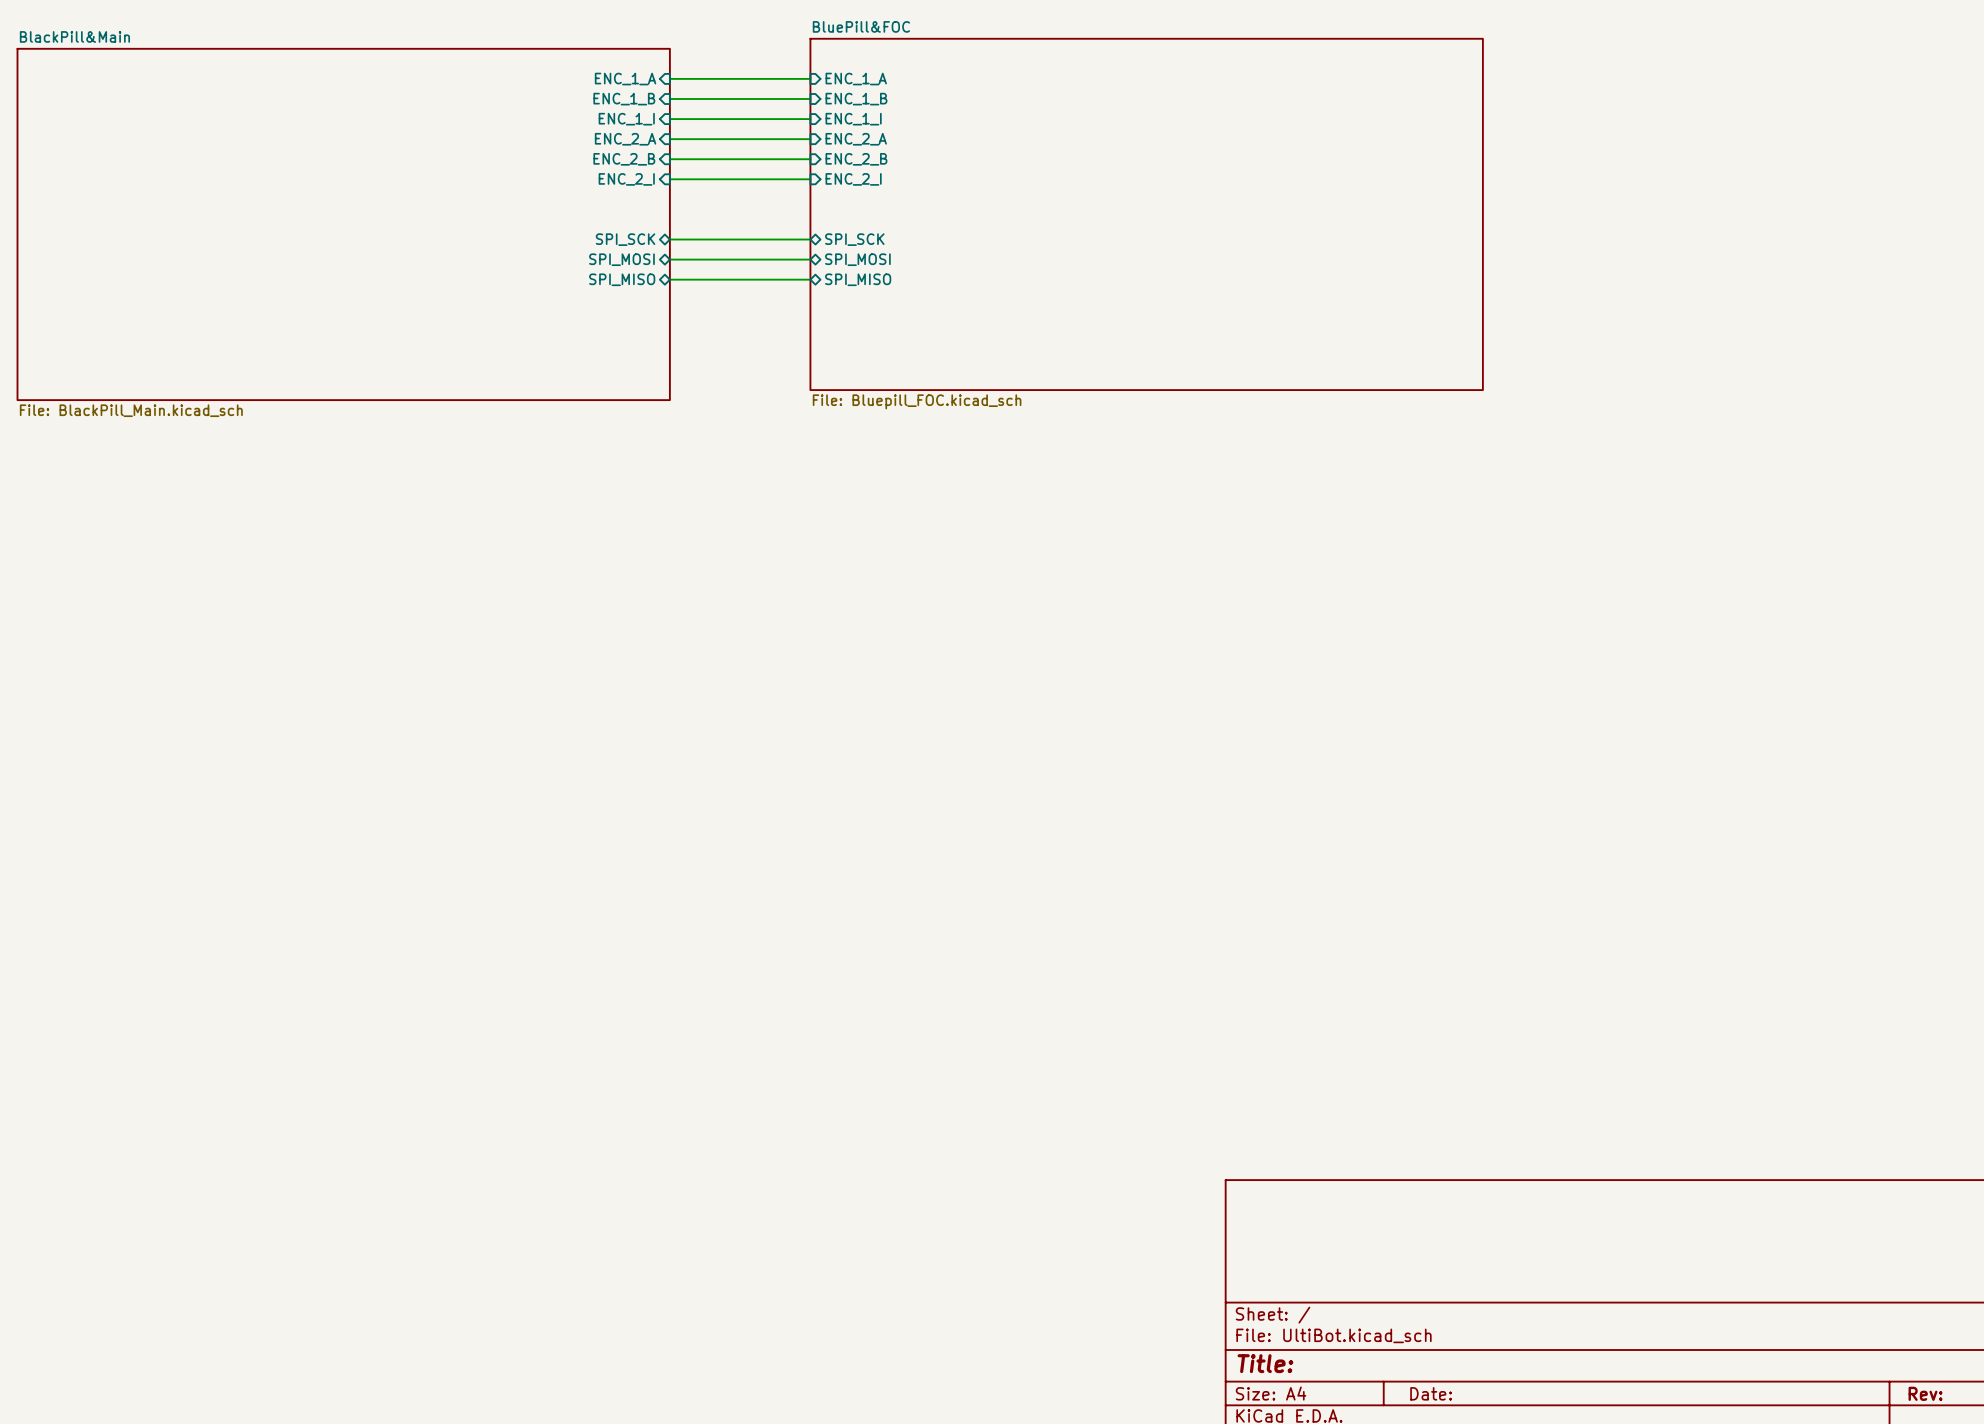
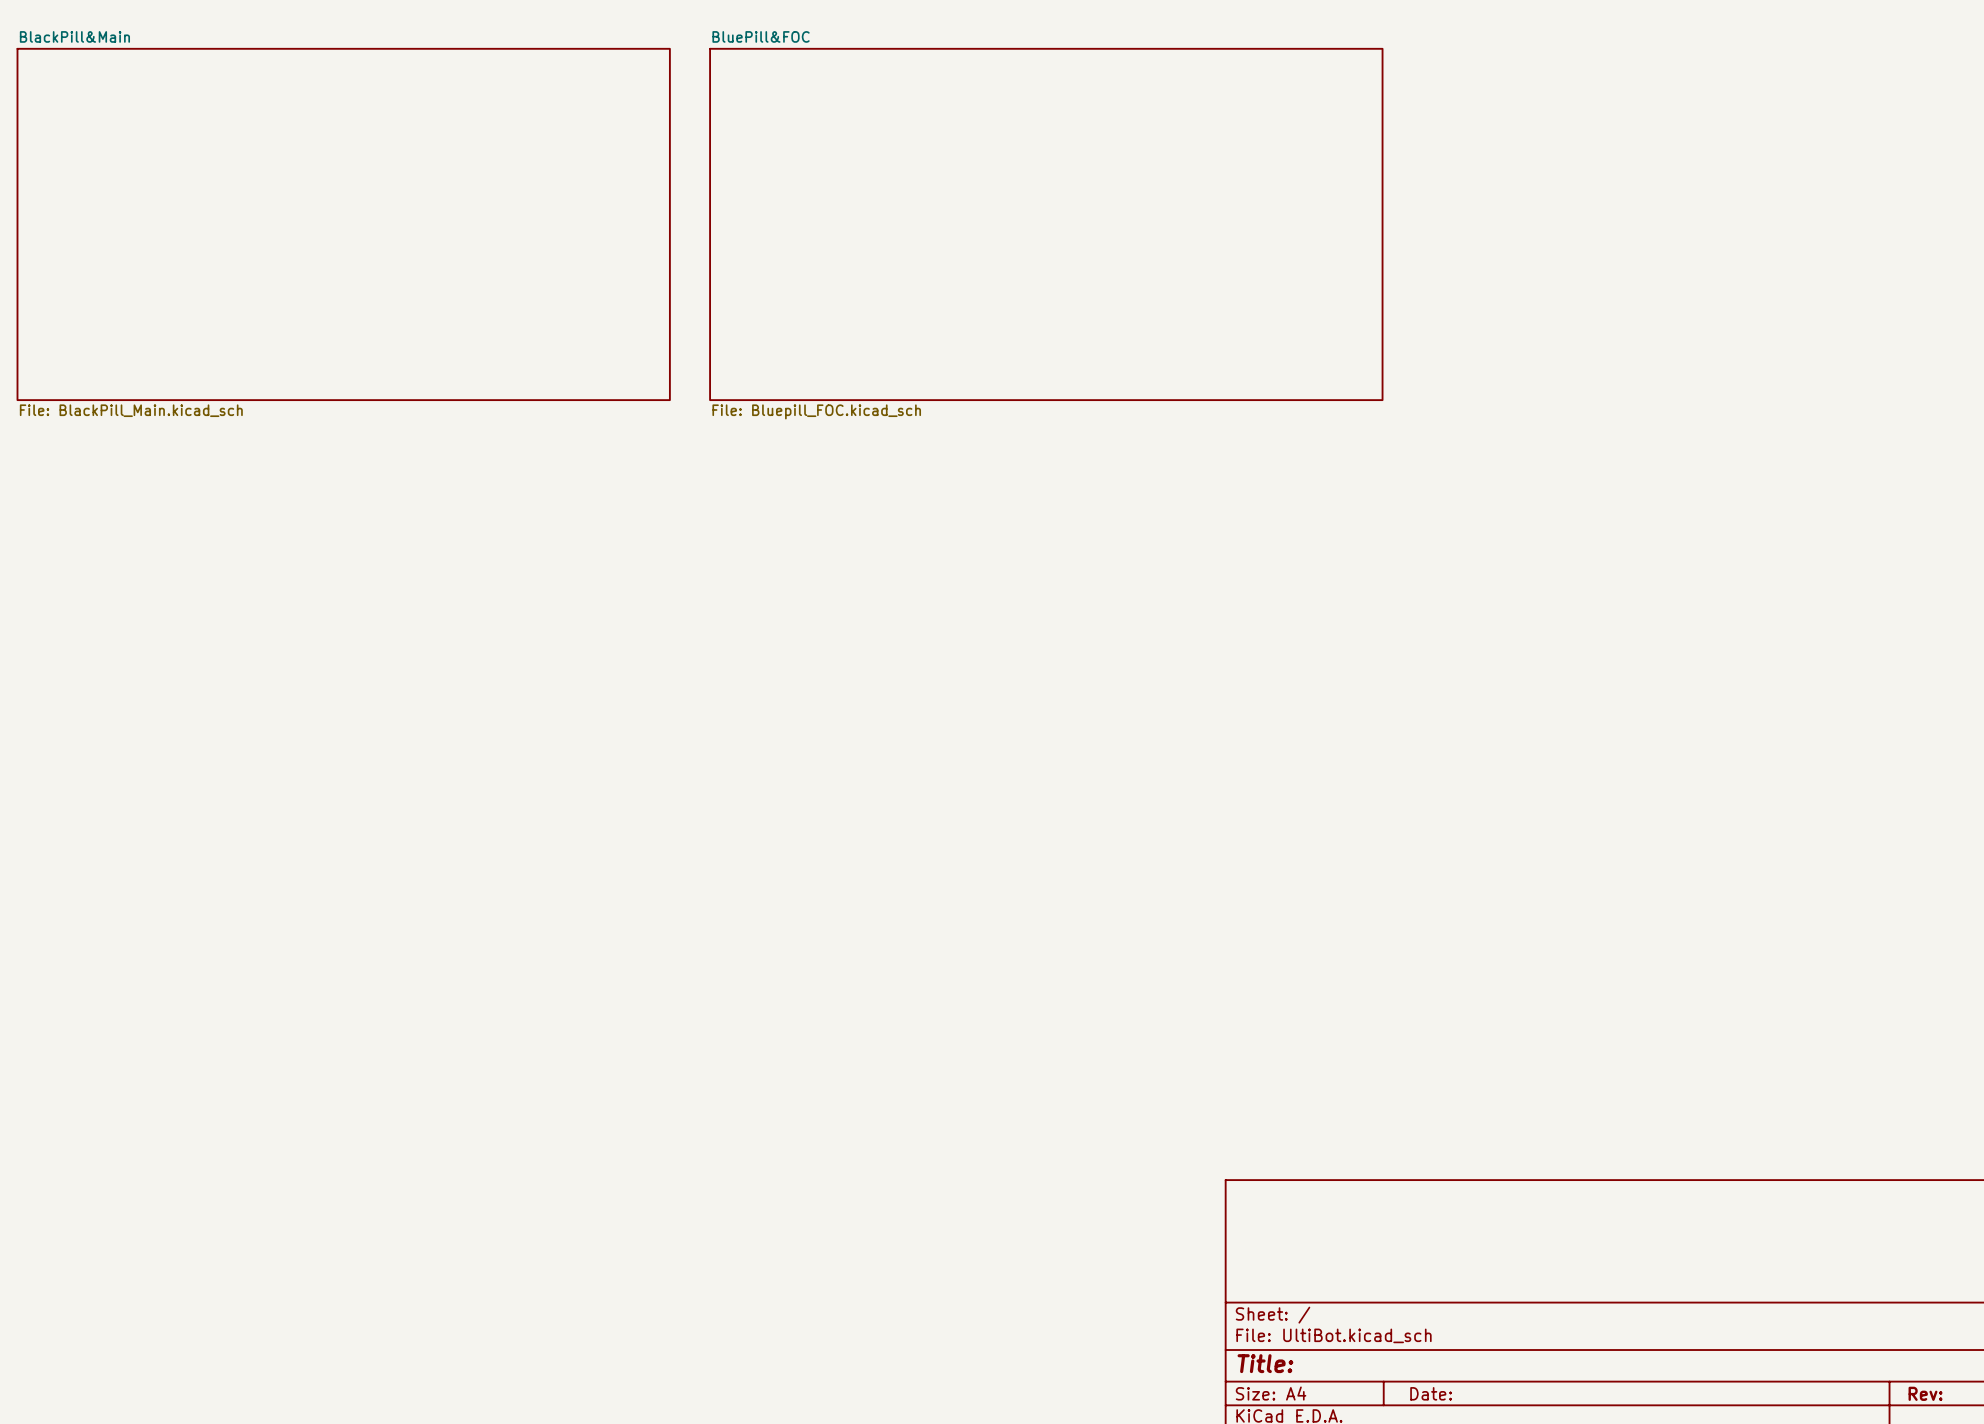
wire: (669, 78) (810, 78) -> none
sheet pin: ENC_1_A (625, 79) -> none
sheet pin: ENC_1_A (856, 79) -> none
sheet pin: ENC_1_B (624, 99) -> none
wire: (669, 99) (810, 99) -> none
sheet pin: ENC_1_B (856, 99) -> none
sheet pin: ENC_1_I (626, 119) -> none
wire: (669, 119) (810, 119) -> none
sheet pin: ENC_1_I (853, 119) -> none
sheet pin: ENC_2_A (625, 139) -> none
wire: (669, 139) (810, 139) -> none
sheet pin: ENC_2_A (856, 139) -> none
sheet pin: ENC_2_B (624, 159) -> none
wire: (669, 159) (810, 159) -> none
sheet pin: ENC_2_B (856, 159) -> none
sheet pin: ENC_2_I (626, 179) -> none
wire: (669, 179) (810, 179) -> none
sheet pin: ENC_2_I (853, 179) -> none
sheet BluePill&FOC position: (1146, 214) -> (1046, 224)
sheet pin: SPI_SCK (625, 239) -> none
wire: (669, 239) (810, 239) -> none
sheet pin: SPI_SCK (854, 239) -> none
sheet pin: SPI_MOSI (621, 259) -> none
wire: (669, 259) (810, 259) -> none
sheet pin: SPI_MOSI (857, 259) -> none
sheet pin: SPI_MISO (622, 279) -> none
wire: (669, 279) (810, 279) -> none
sheet pin: SPI_MISO (858, 279) -> none

